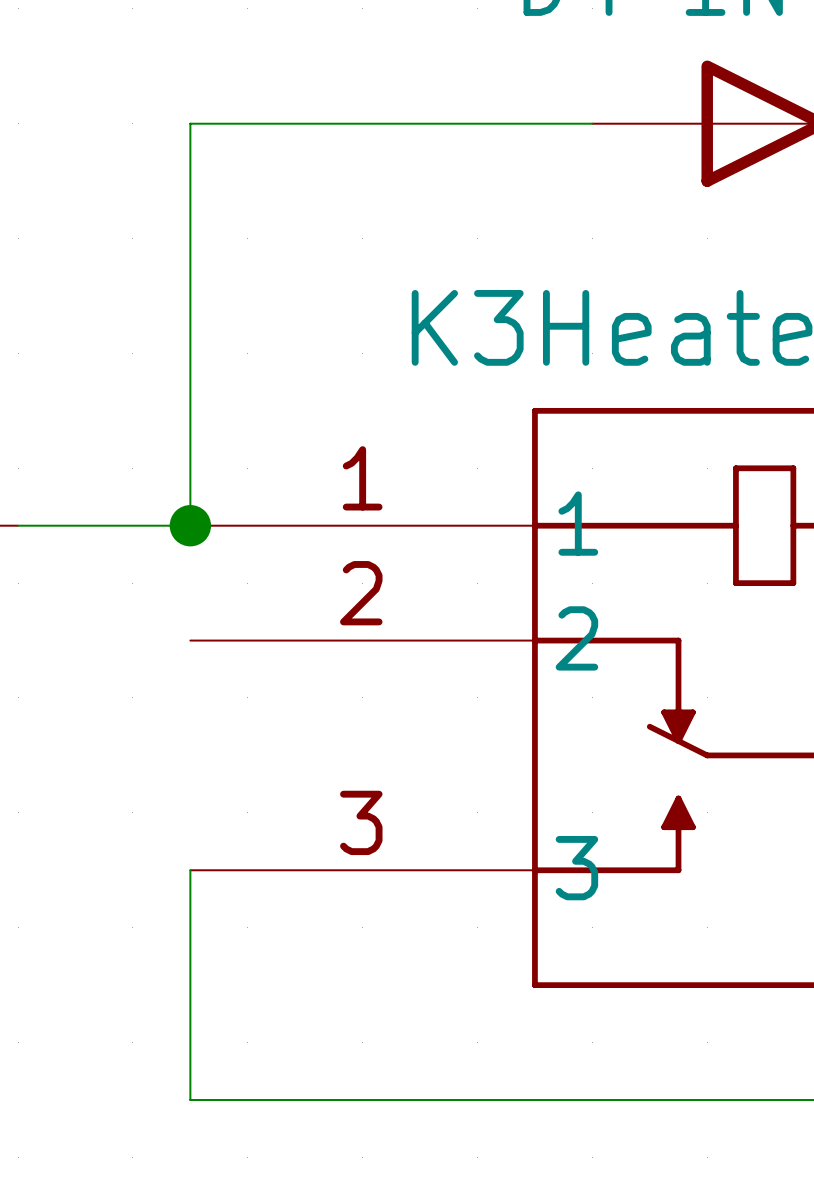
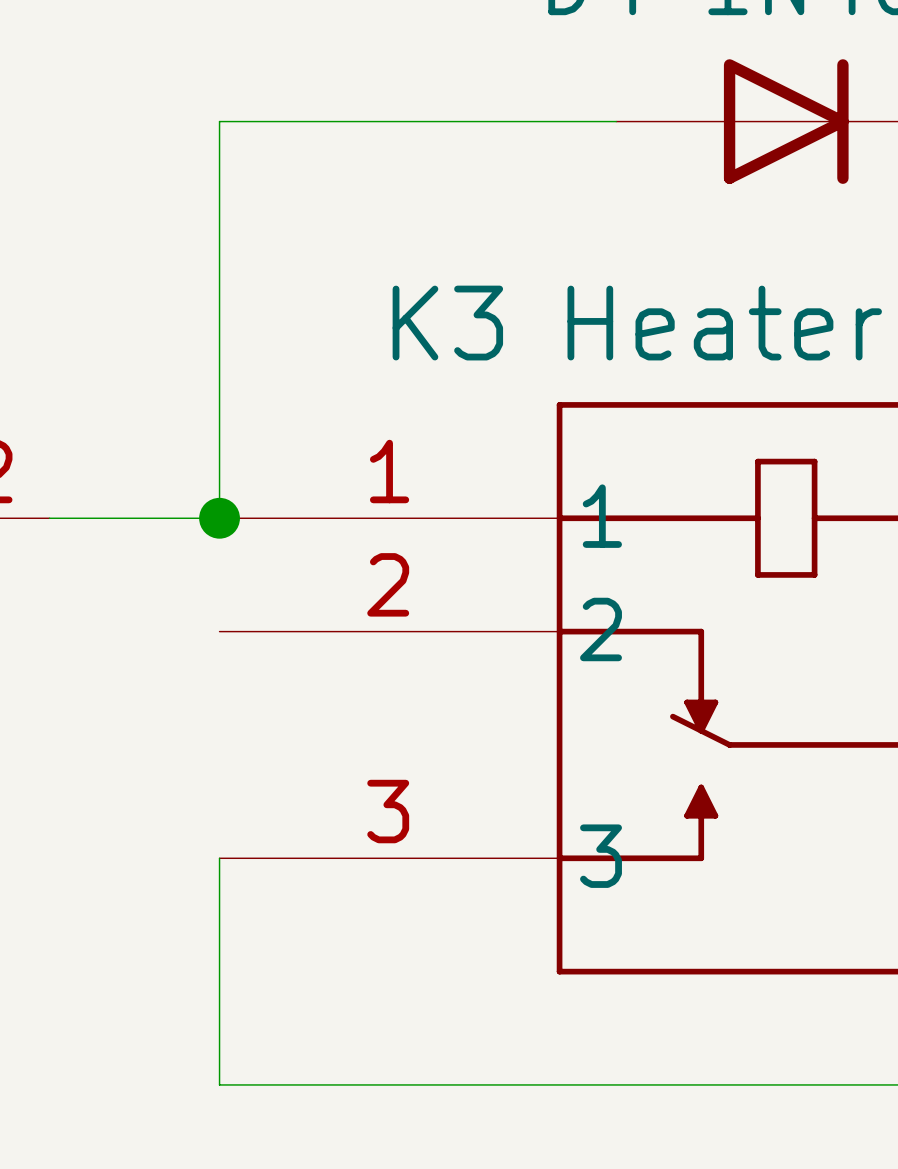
K3 name position: K3 (467, 327) -> K3 (447, 323)

